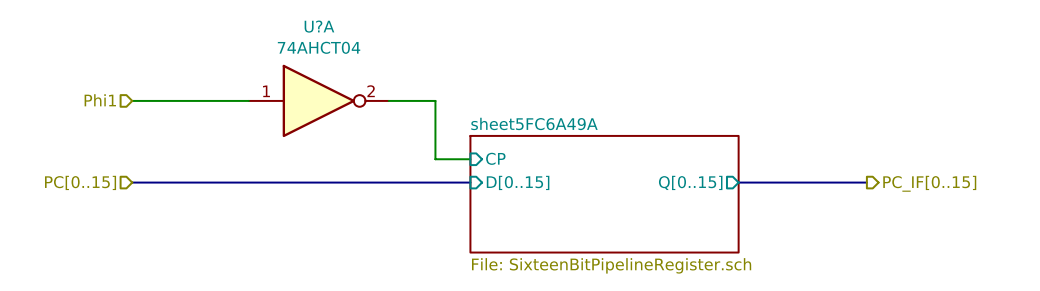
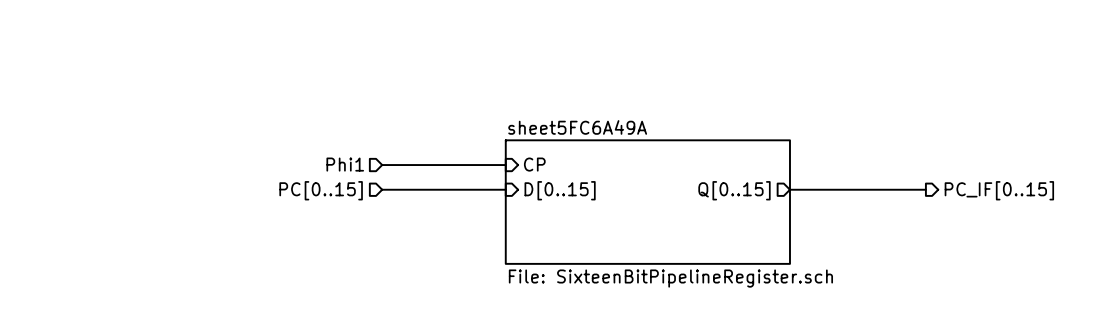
hierarchical label position: Phi1 (100, 100) -> Phi1 (345, 164)
wire: (132, 100) (248, 100) -> none
U?A: 74AHCT04 (318, 100) -> none
wire: (388, 100) (435, 100) (435, 159) -> (382, 165) (468, 165)
hierarchical label position: PC[0..15] (80, 182) -> PC[0..15] (321, 190)
bus: (132, 182) (353, 182) -> none

